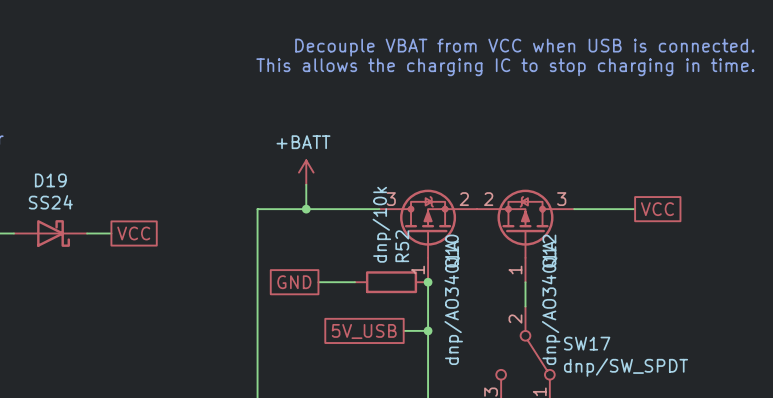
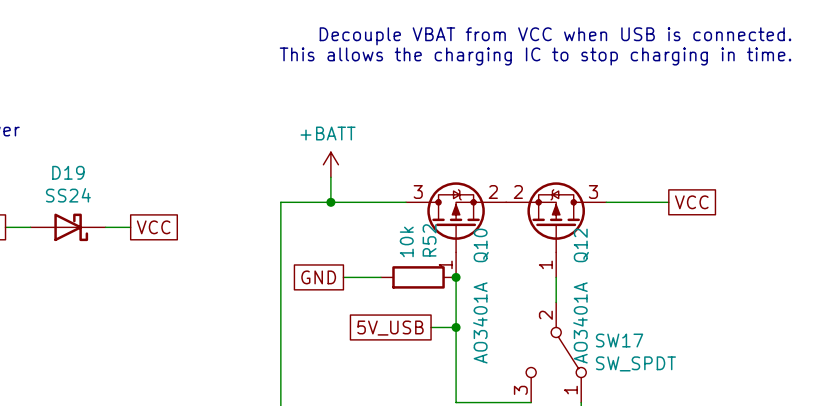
R52 value: dnp/10k (381, 224) -> 10k (406, 241)
Q10 value: dnp/AO3401A (453, 302) -> AO3401A (480, 322)
Q12 value: dnp/AO3401A (551, 302) -> AO3401A (580, 322)
SW17 value: dnp/SW_SPDT (626, 367) -> SW_SPDT (635, 363)

